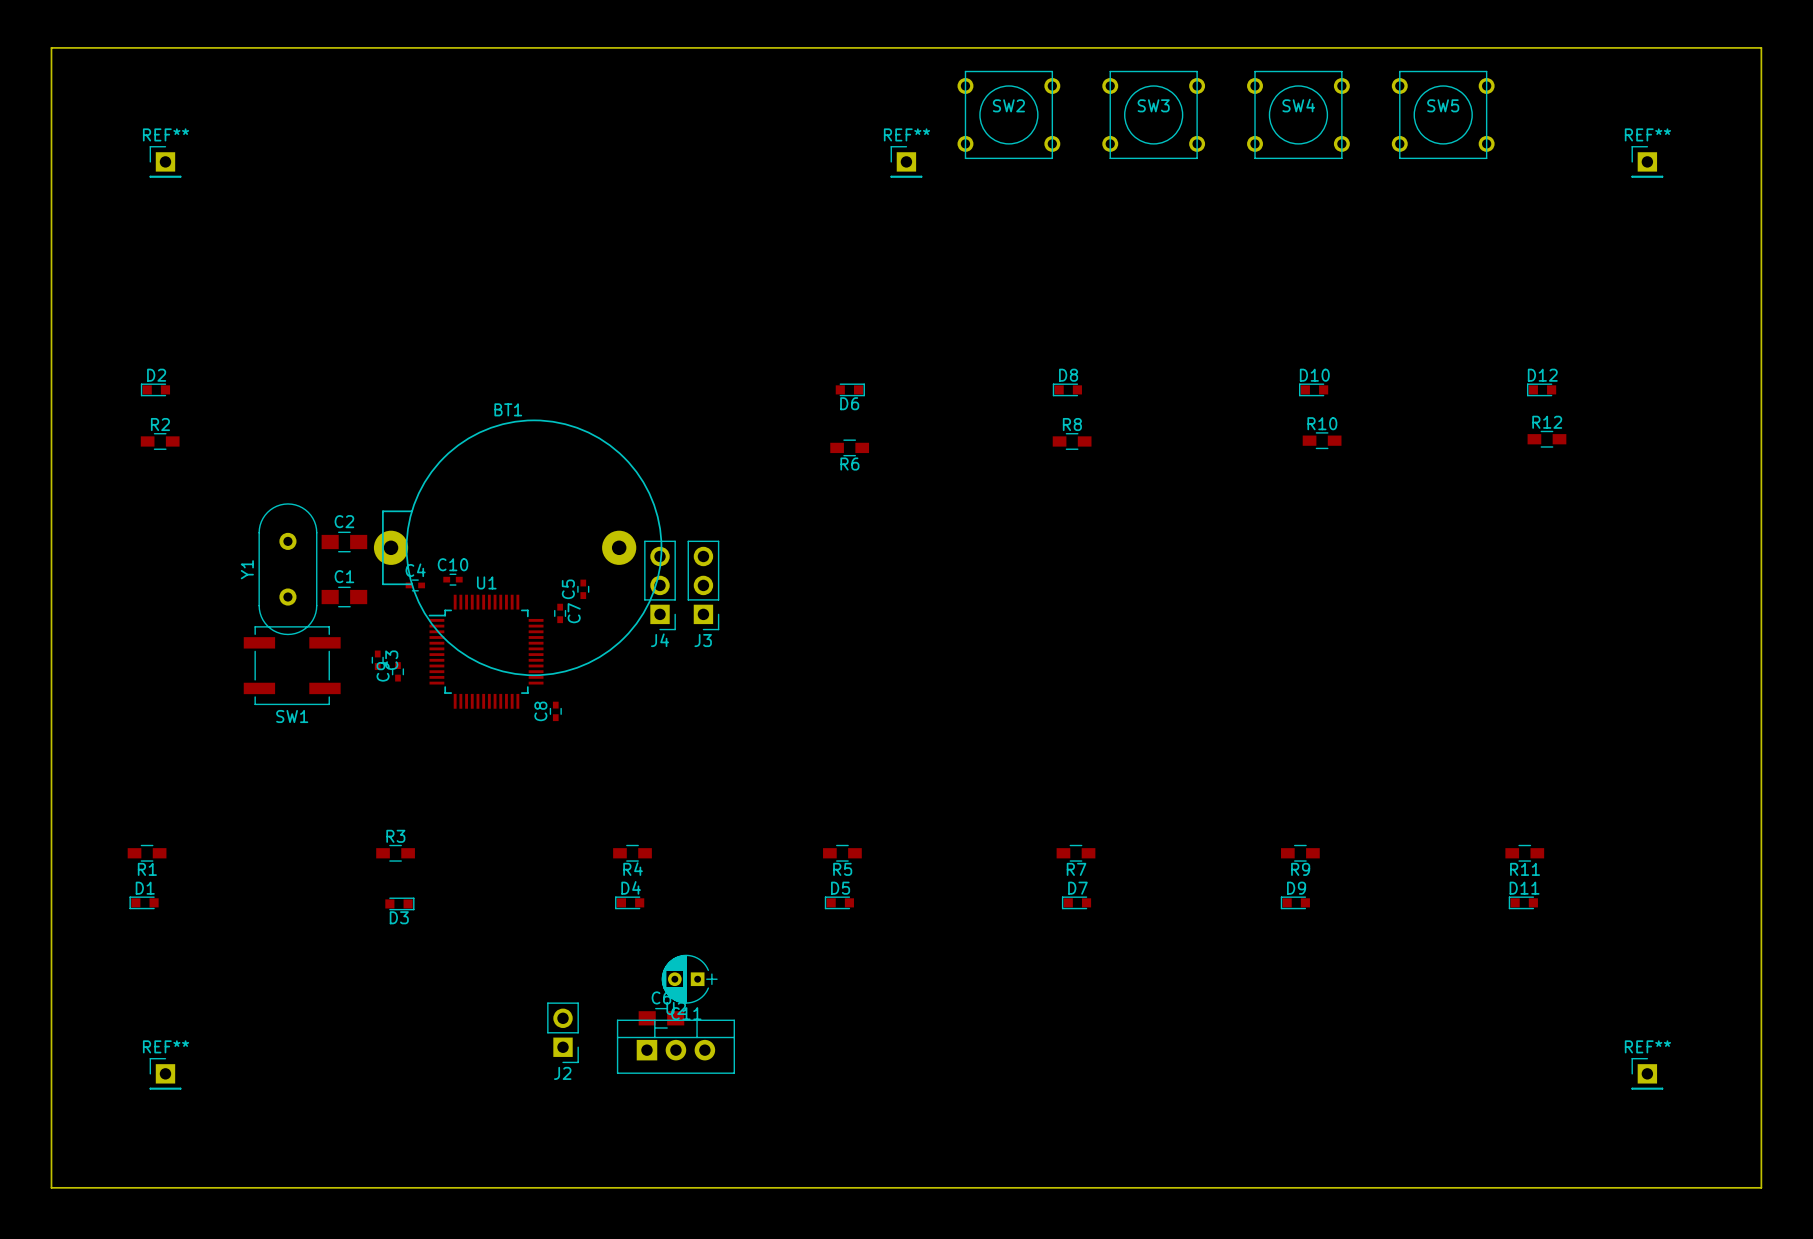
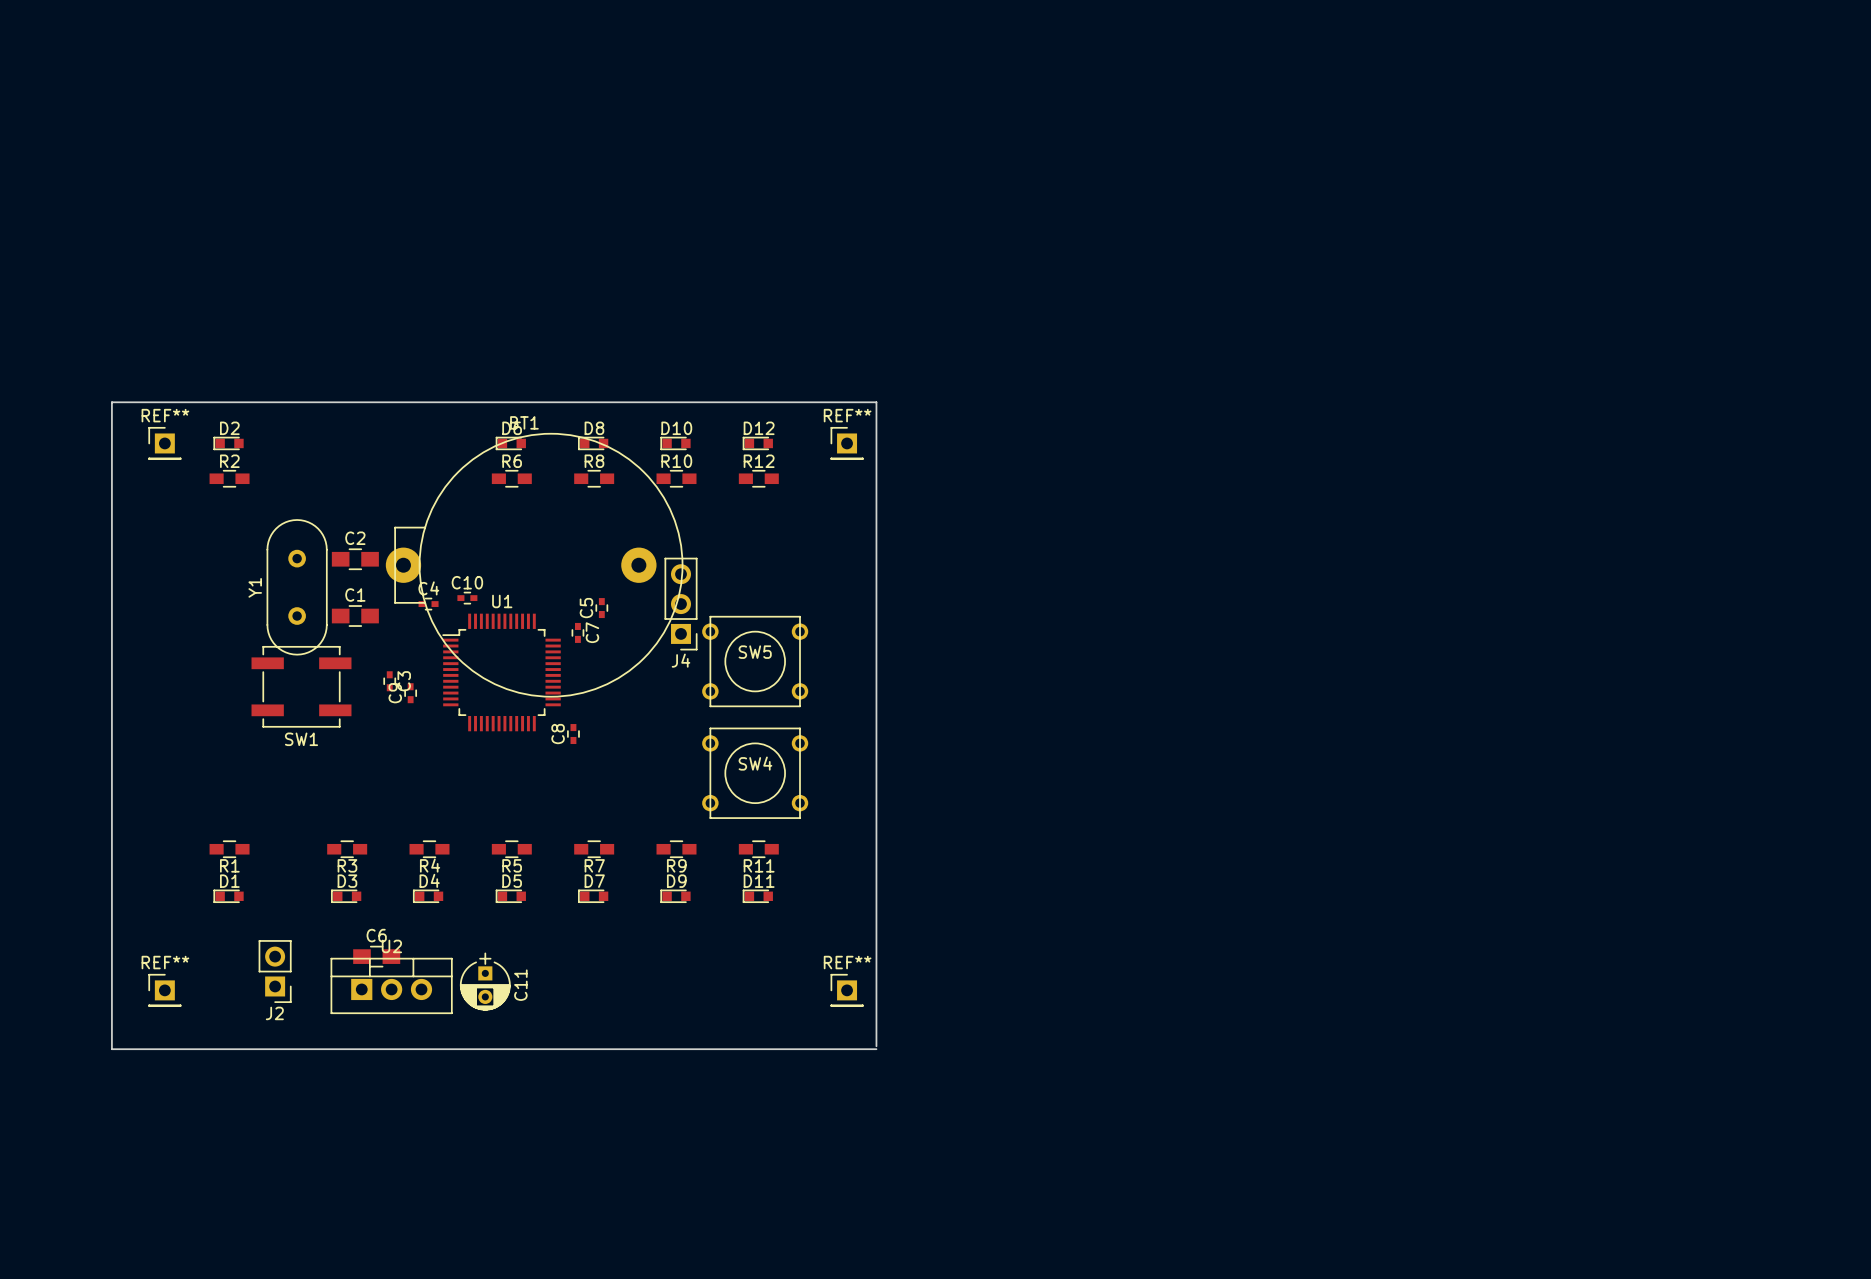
board edge: (51, 47) (1761, 47) (1761, 1187) (51, 1187) (51, 47) -> none
SW2: (1008, 114) -> none
SW3: (1153, 114) -> none
SW4 position: (1298, 114) -> (755, 773)
SW5 position: (1443, 114) -> (755, 661)
REF** position: (165, 161) -> (164, 443)
REF** position: (906, 161) -> (847, 443)
REF**: (1647, 161) -> none
D2 position: (155, 389) -> (228, 443)
D6 rotation: 0° (850, 389) -> 180° (510, 443)
D6 position: (850, 389) -> (510, 443)
D8 position: (1067, 389) -> (593, 443)
D10 position: (1313, 389) -> (675, 443)
D12 position: (1541, 389) -> (757, 443)
R12 position: (1546, 439) -> (758, 478)
R10 position: (1322, 440) -> (676, 478)
R2 position: (160, 441) -> (229, 478)
R8 position: (1072, 441) -> (594, 478)
R6 position: (849, 447) -> (511, 478)
R6 name position: R6 (849, 464) -> R6 (512, 461)
J3: (703, 585) -> none
R3 name position: R3 (395, 836) -> R3 (347, 865)
R1 position: (147, 853) -> (229, 849)
R3 position: (395, 853) -> (347, 849)
R4 position: (632, 853) -> (429, 849)
R5 position: (842, 853) -> (511, 849)
R7 position: (1075, 853) -> (594, 849)
R9 position: (1300, 853) -> (676, 849)
R11 position: (1524, 853) -> (758, 849)
D1 position: (144, 902) -> (228, 896)
D4 position: (629, 902) -> (428, 896)
D5 position: (839, 902) -> (510, 896)
D7 position: (1076, 902) -> (593, 896)
D9 position: (1295, 902) -> (675, 896)
D11 position: (1523, 902) -> (757, 896)
D3 rotation: 0° (399, 903) -> 180° (346, 896)
D3 position: (399, 903) -> (346, 896)
REF**: none -> (847, 990)
C11 rotation: 0° (689, 979) -> 90° counterclockwise (485, 981)
C11 position: (689, 979) -> (485, 981)
board edge: none -> (876, 1046) (876, 402) (111, 402) (111, 1049) (876, 1049)
C6 position: (661, 1018) -> (376, 956)
J2 position: (563, 1032) -> (275, 971)
U2 position: (675, 1046) -> (391, 985)
REF** position: (165, 1073) -> (164, 990)
REF**: (1647, 1073) -> none

